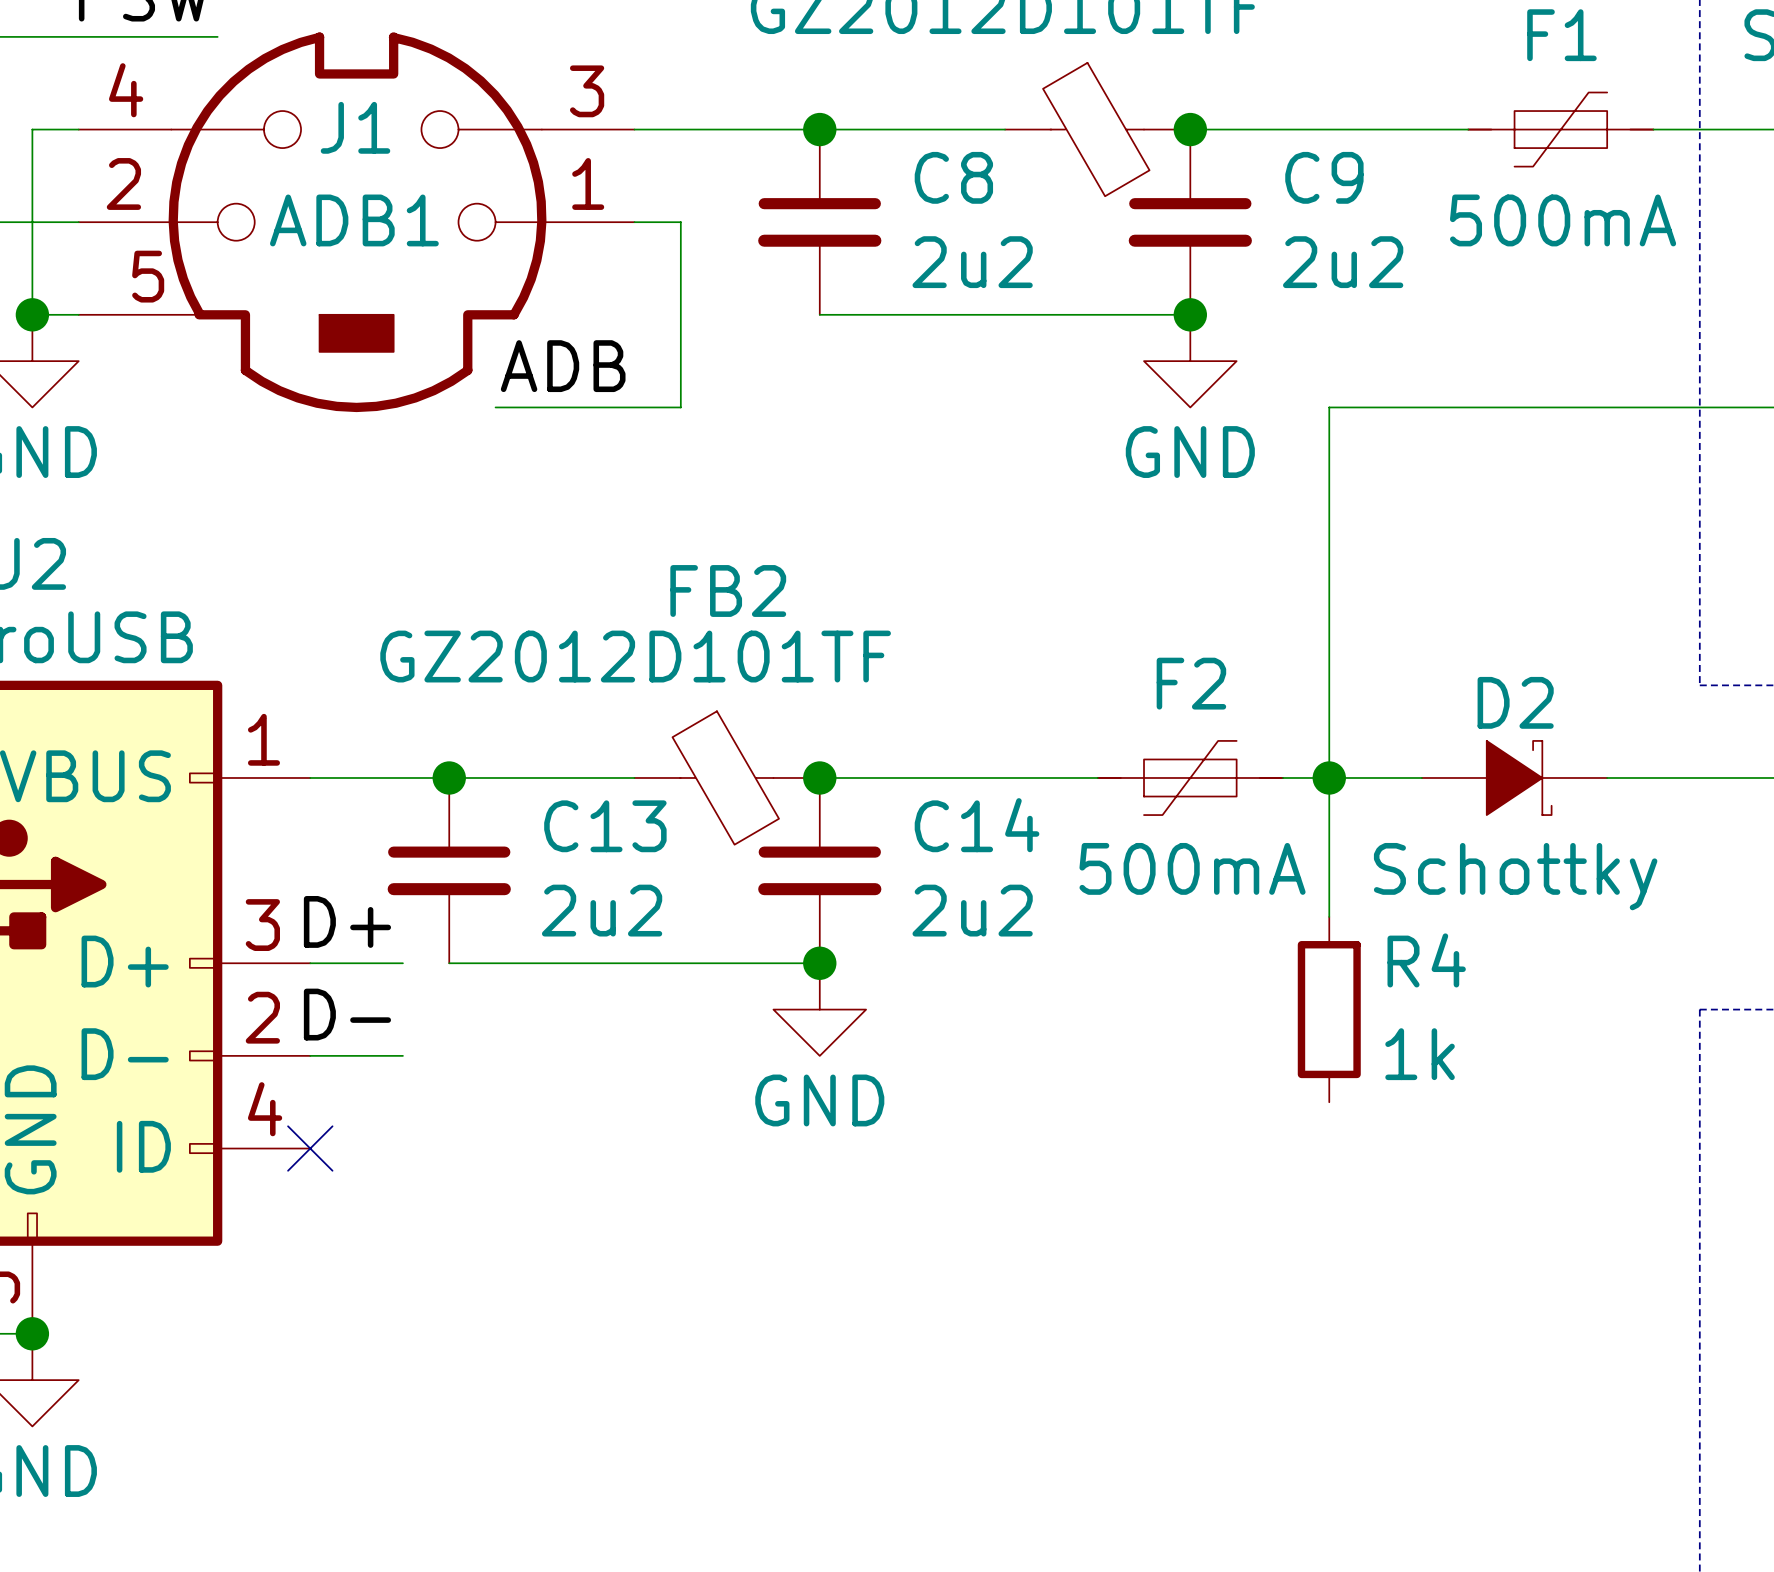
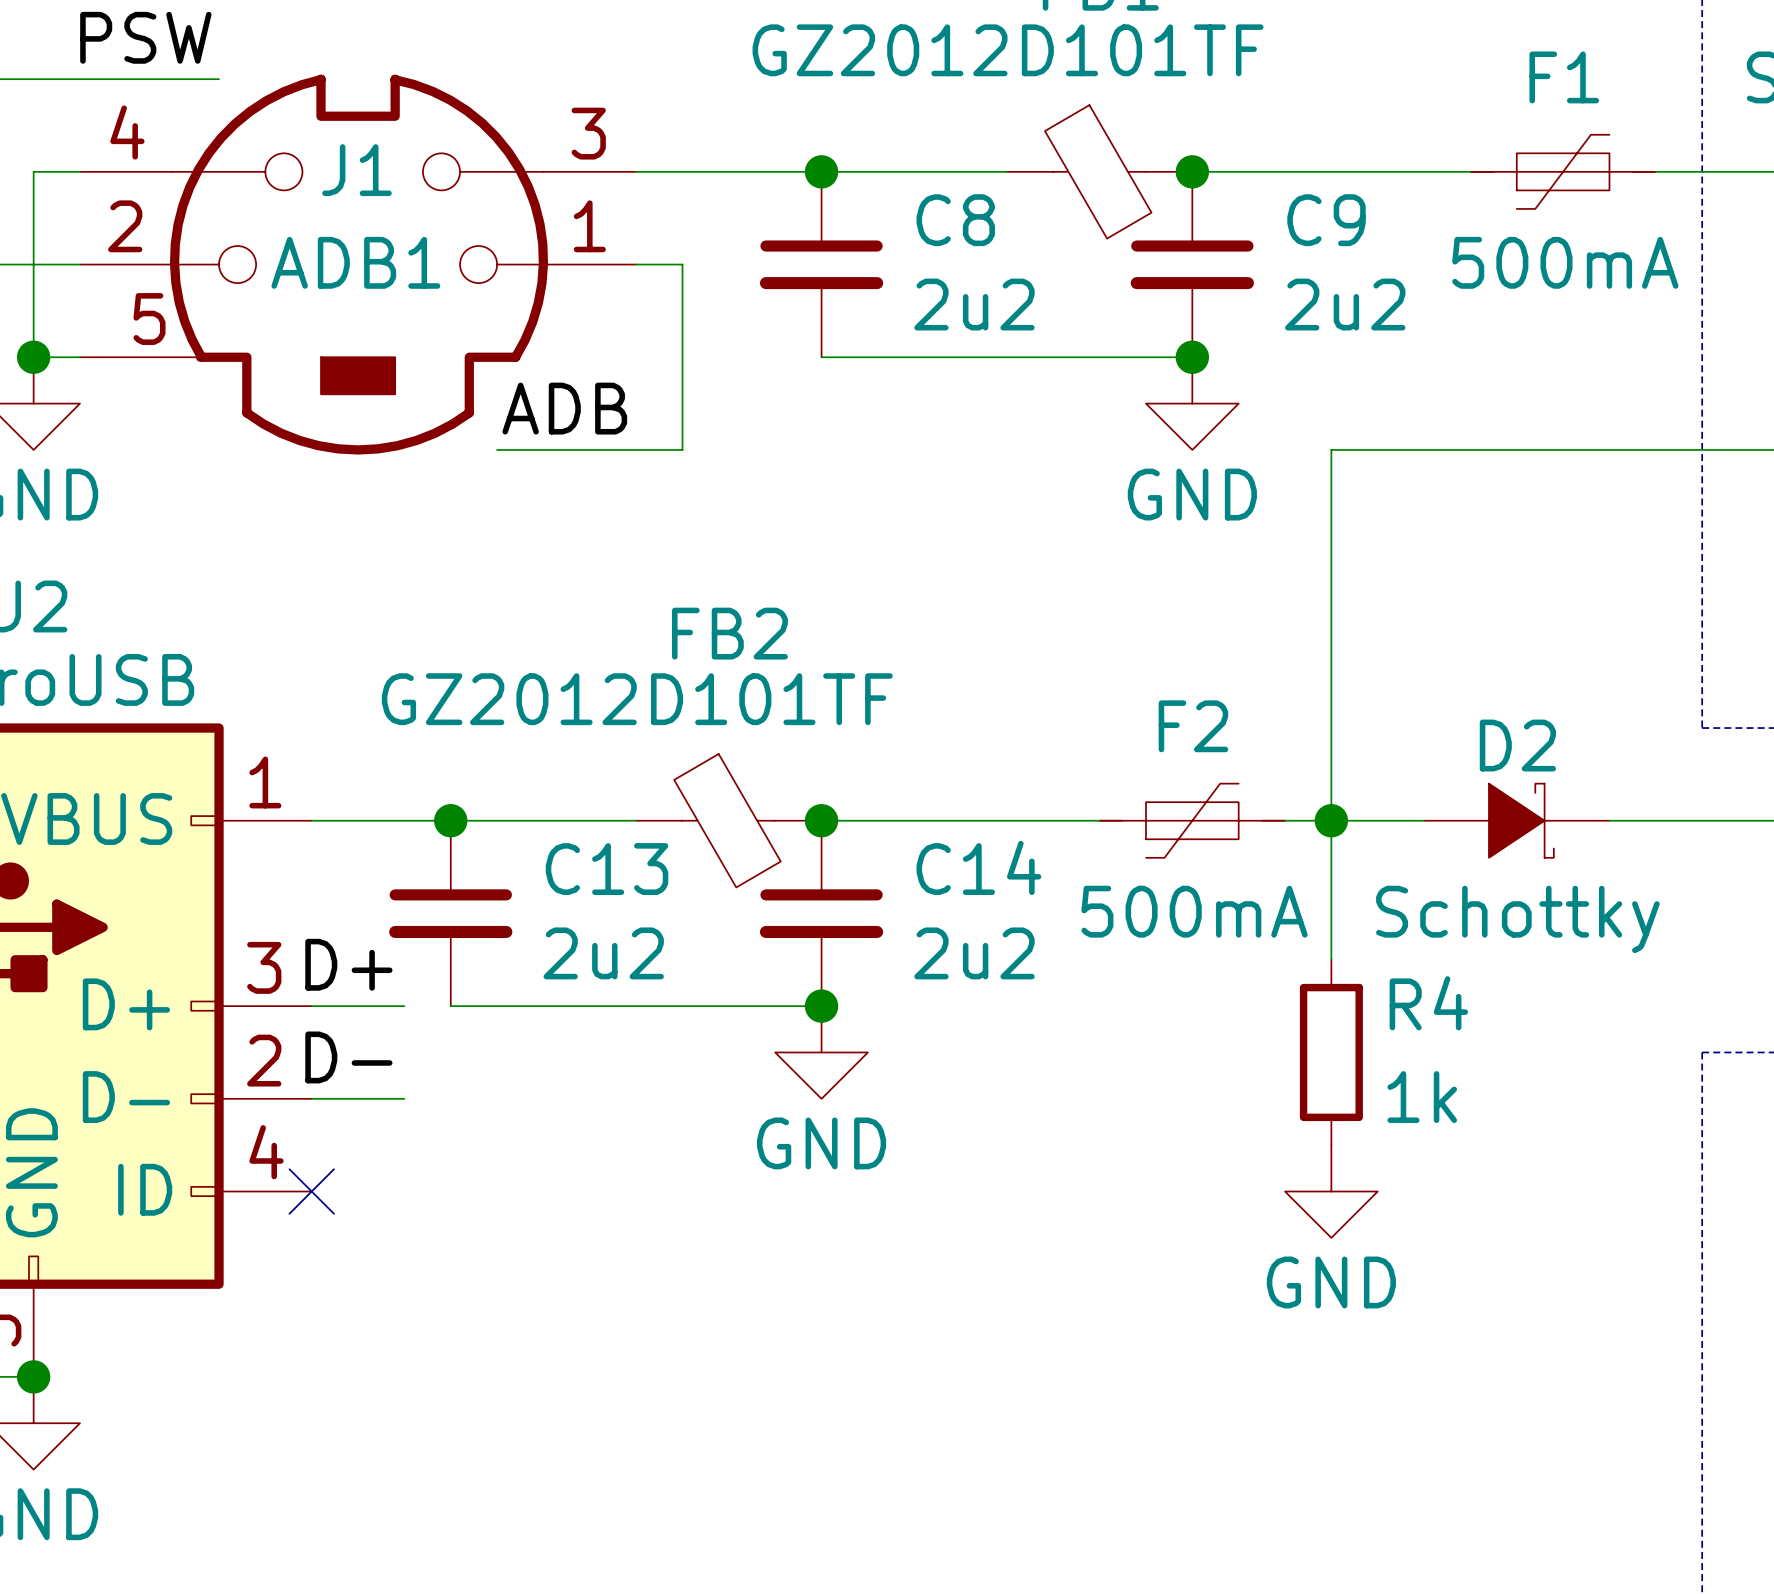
power symbol: none -> GND (1331, 1191)

